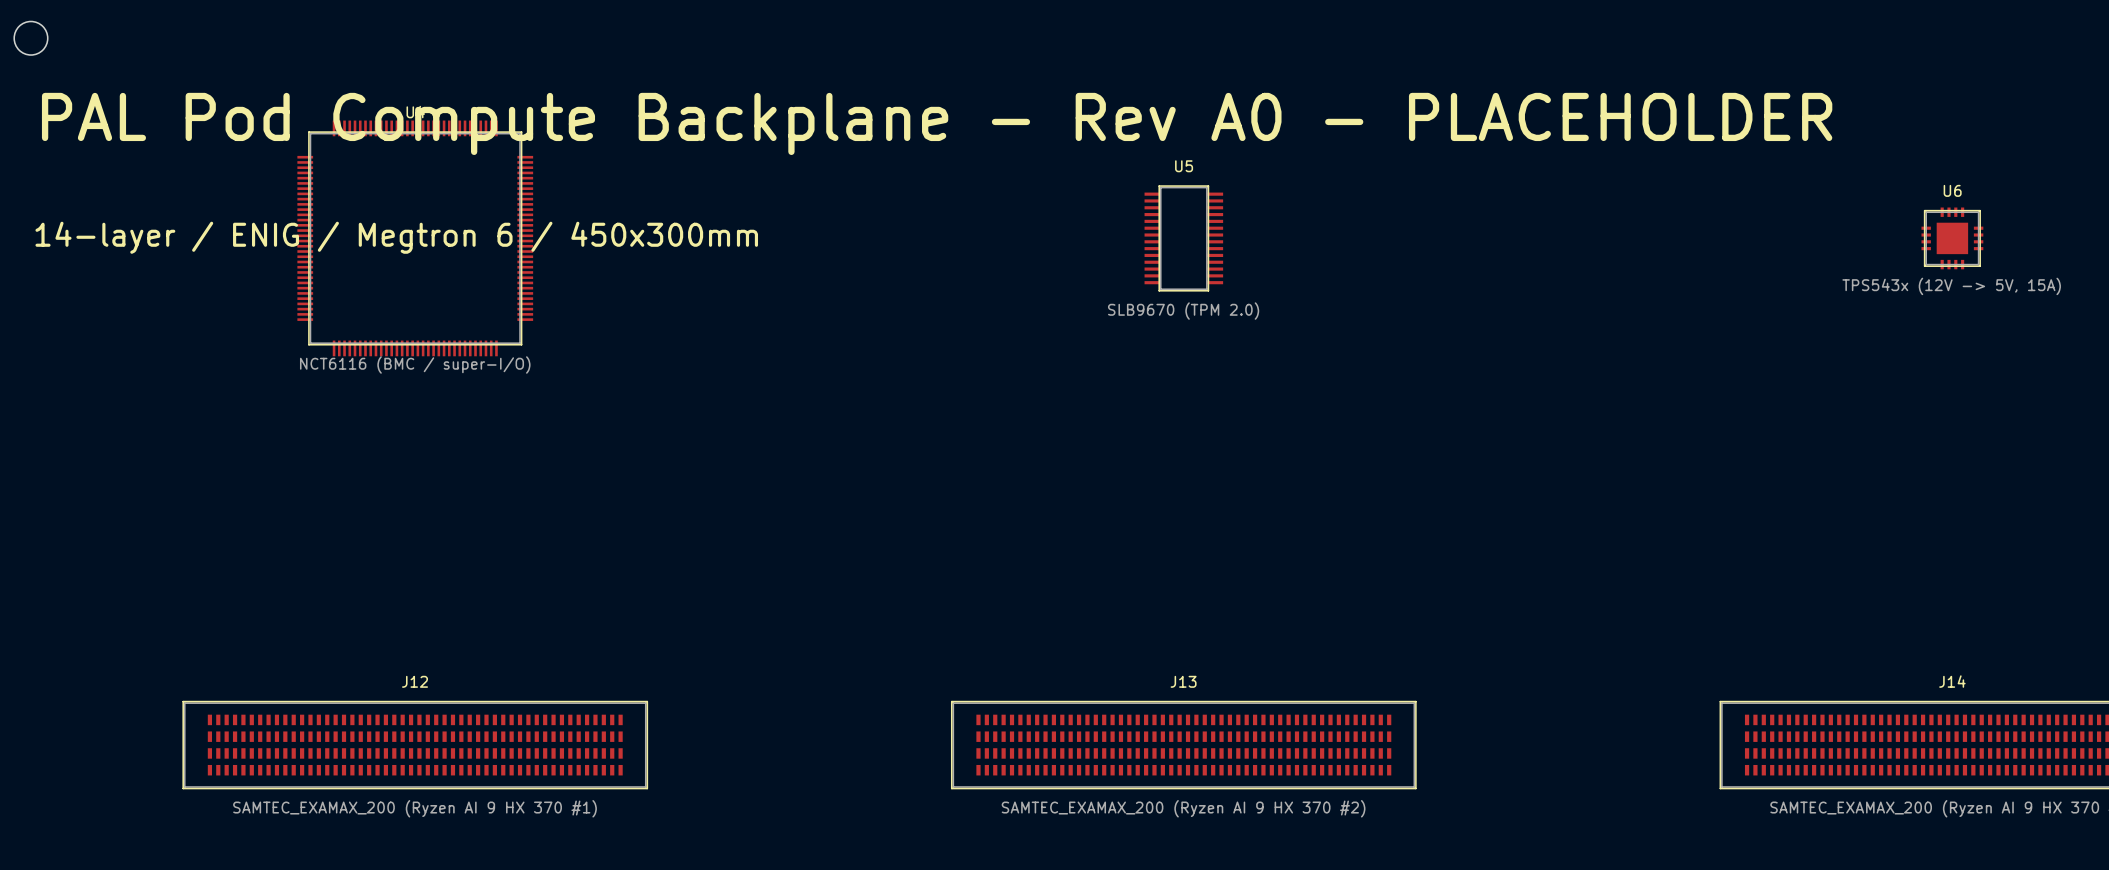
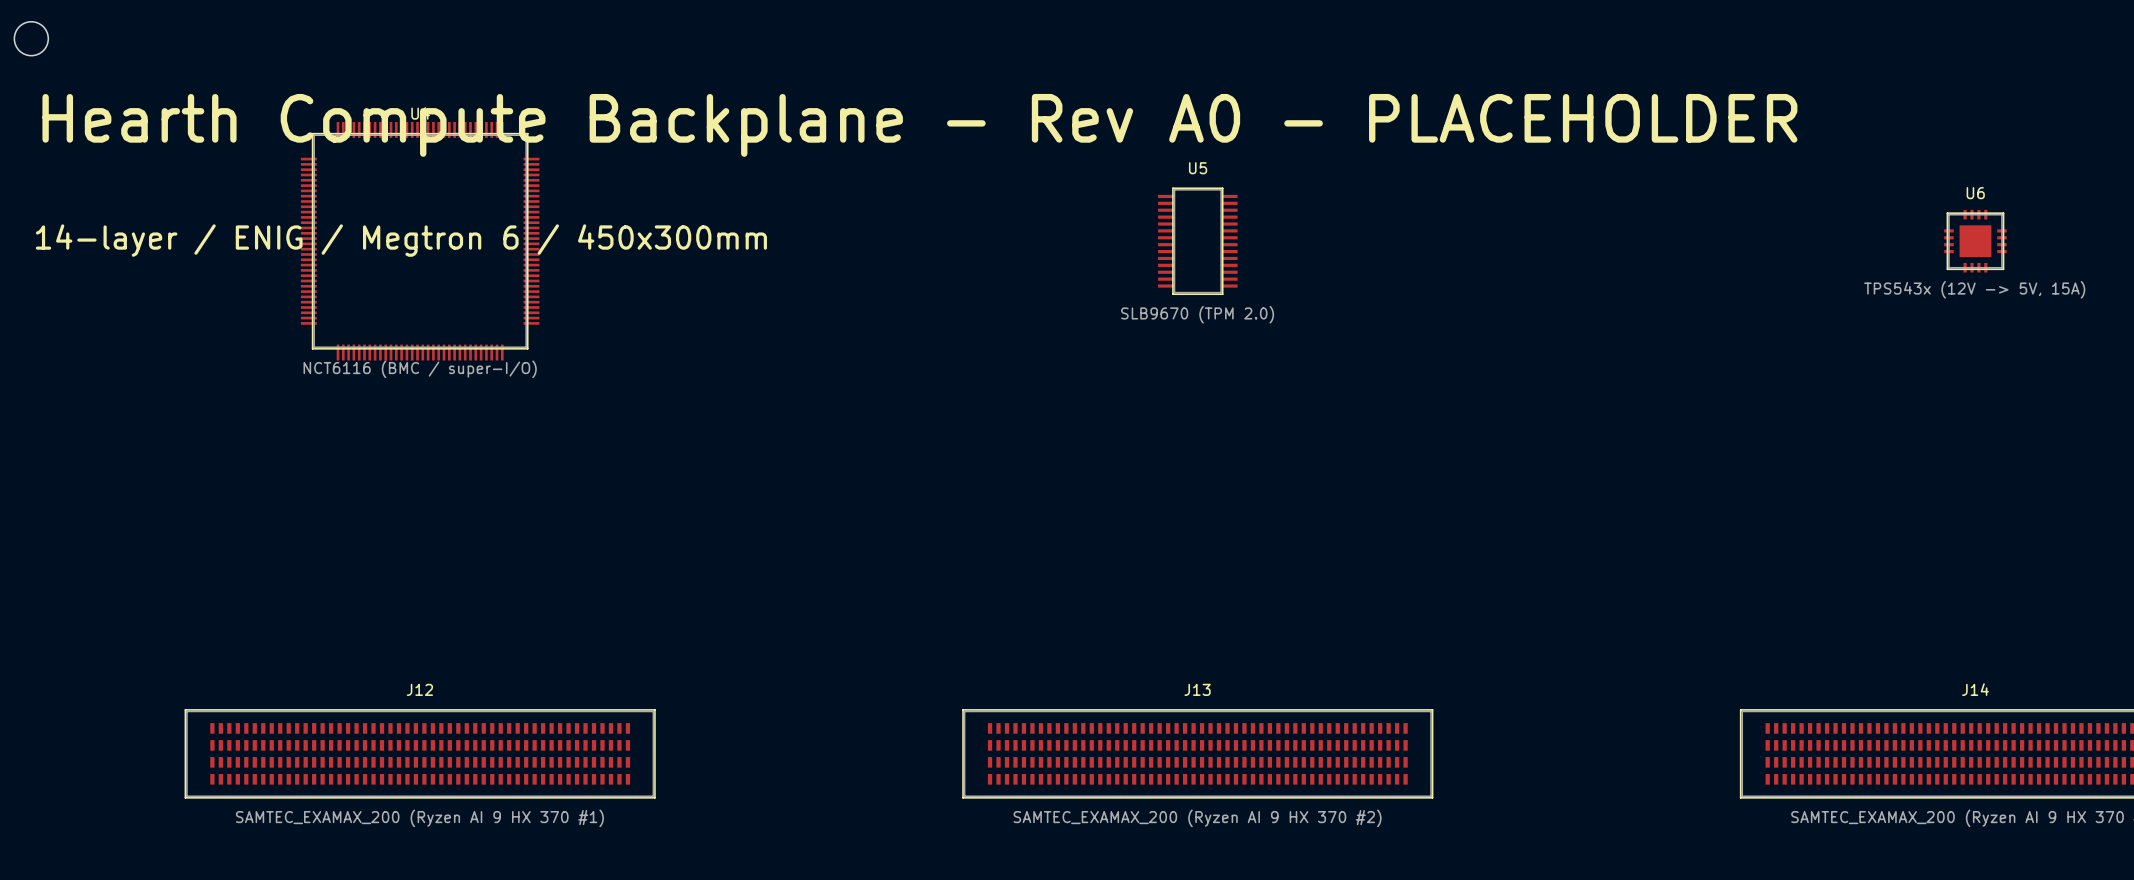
text: PAL Pod Compute Backplane - Rev A0 - PLACEHOLDER (937, 123) -> Hearth Compute Backplane - Rev A0 - PLACEHOLDER (919, 125)

